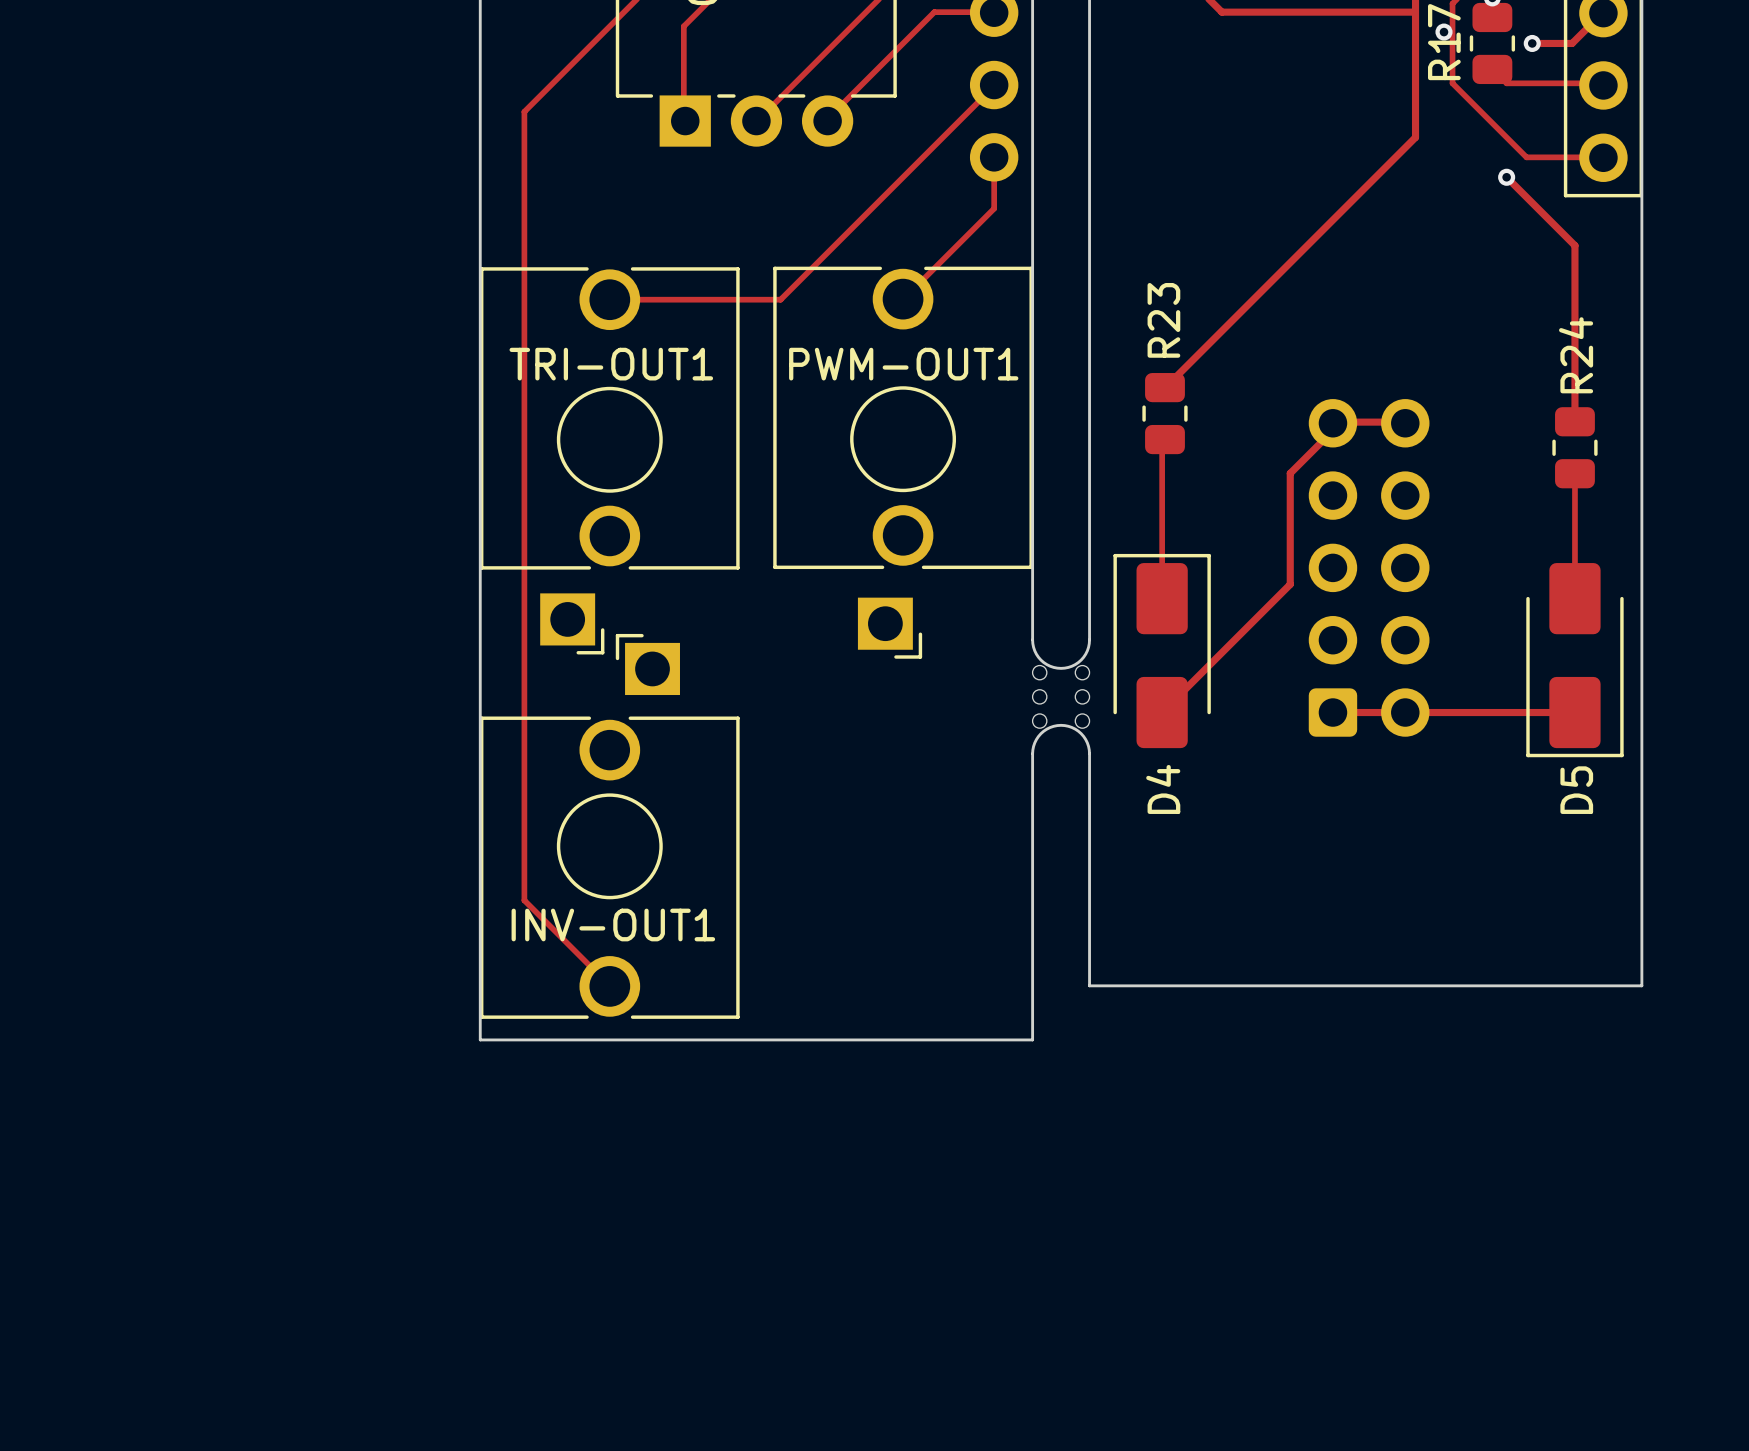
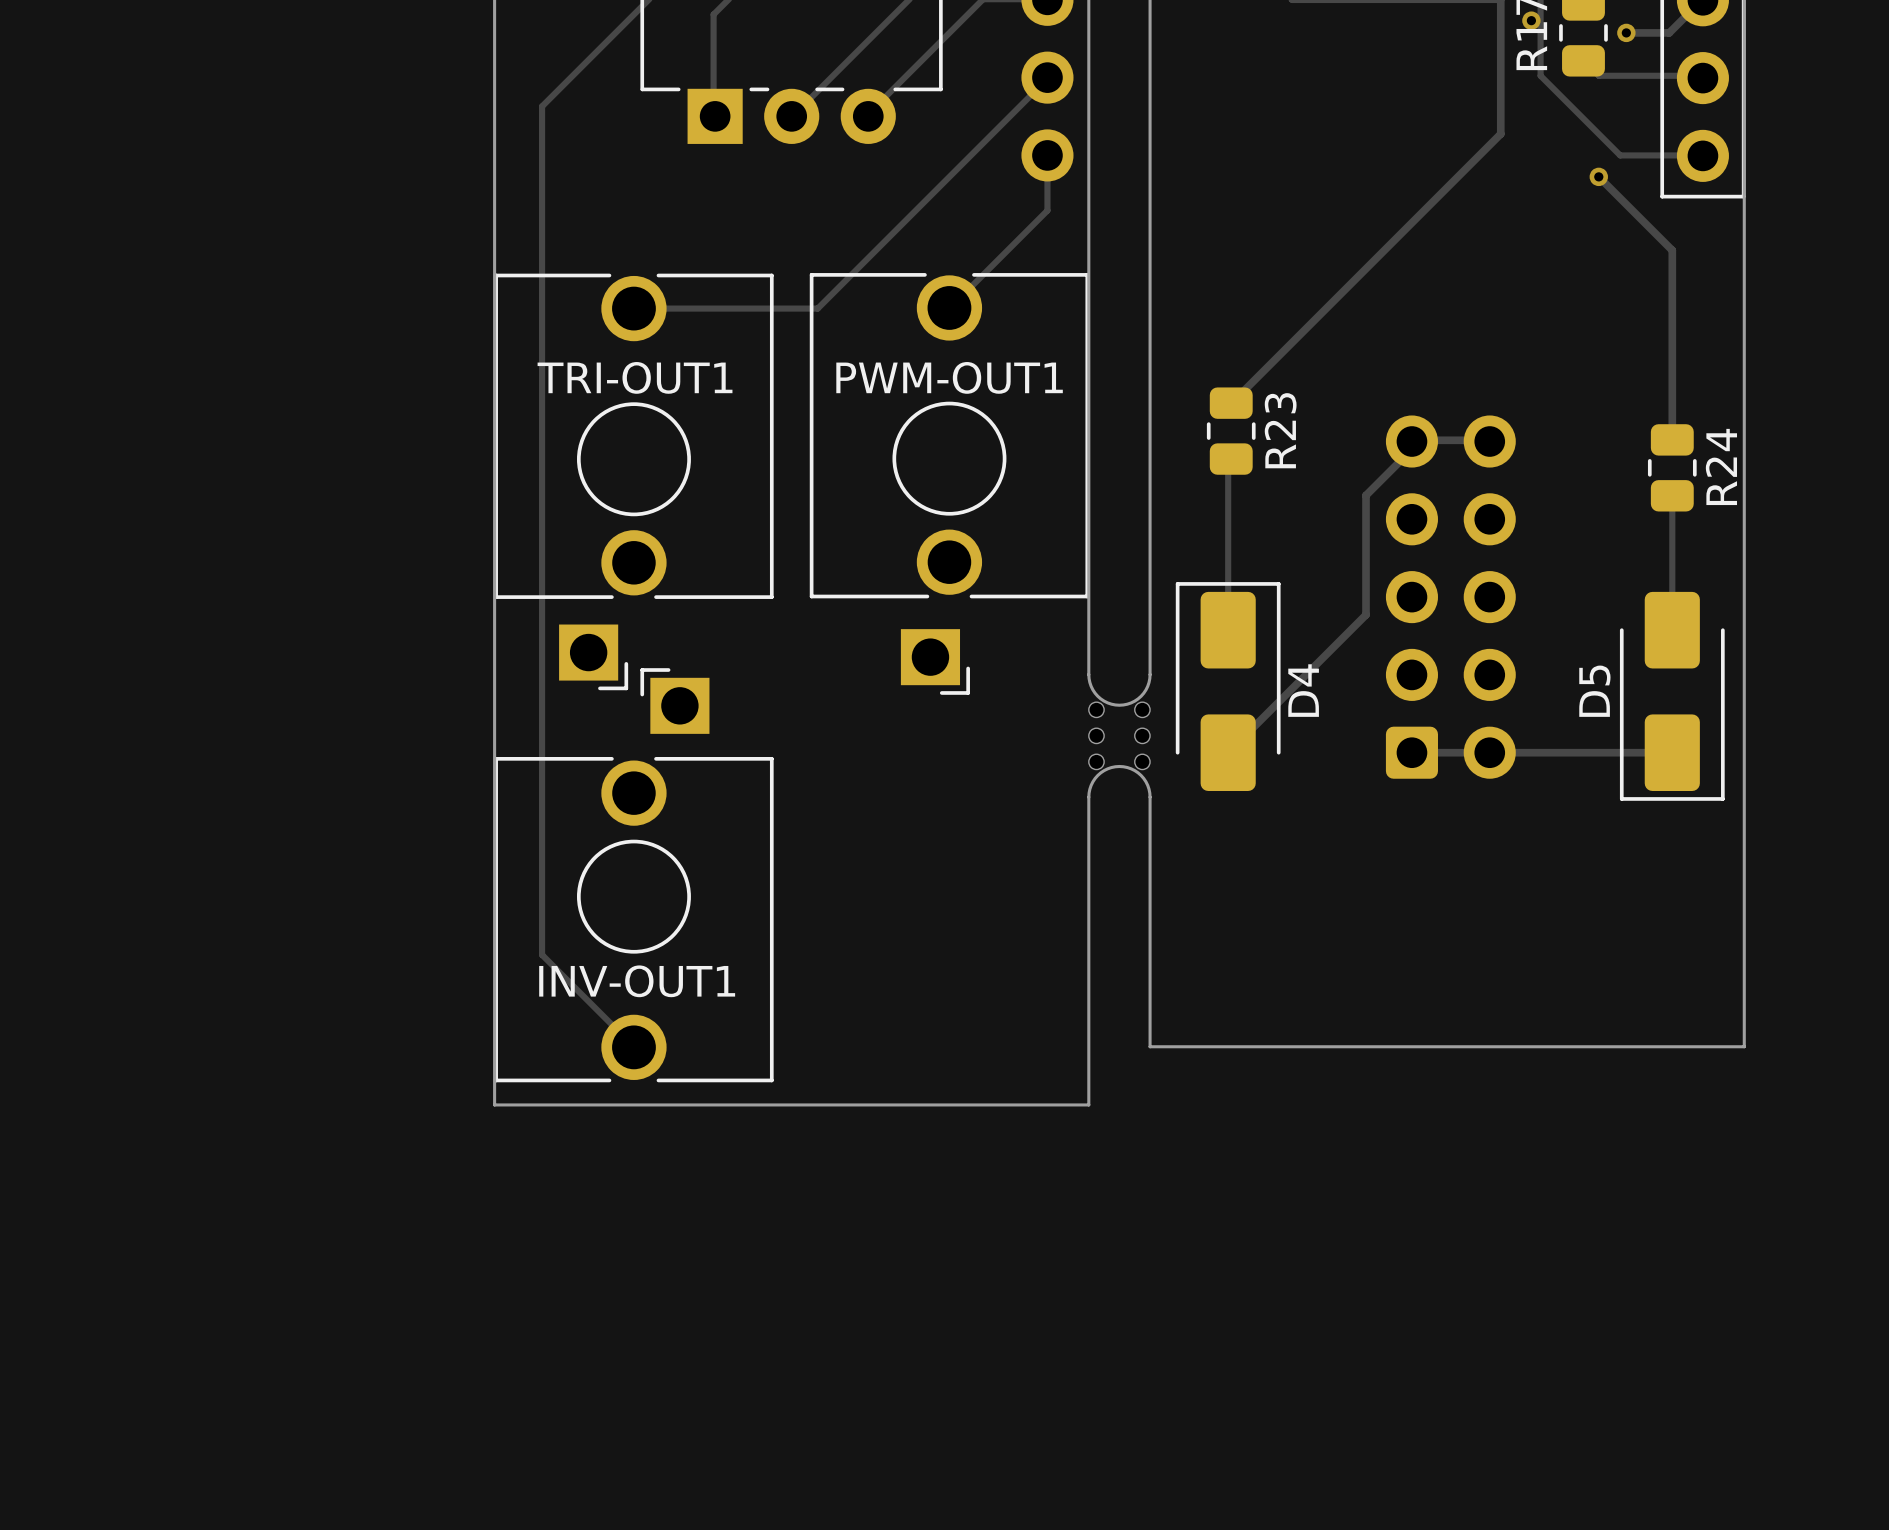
R23 name position: R23 (1163, 320) -> R23 (1280, 430)
R24 name position: R24 (1576, 355) -> R24 (1721, 466)
D4 name position: D4 (1163, 789) -> D4 (1303, 690)
D5 name position: D5 (1576, 790) -> D5 (1594, 691)

